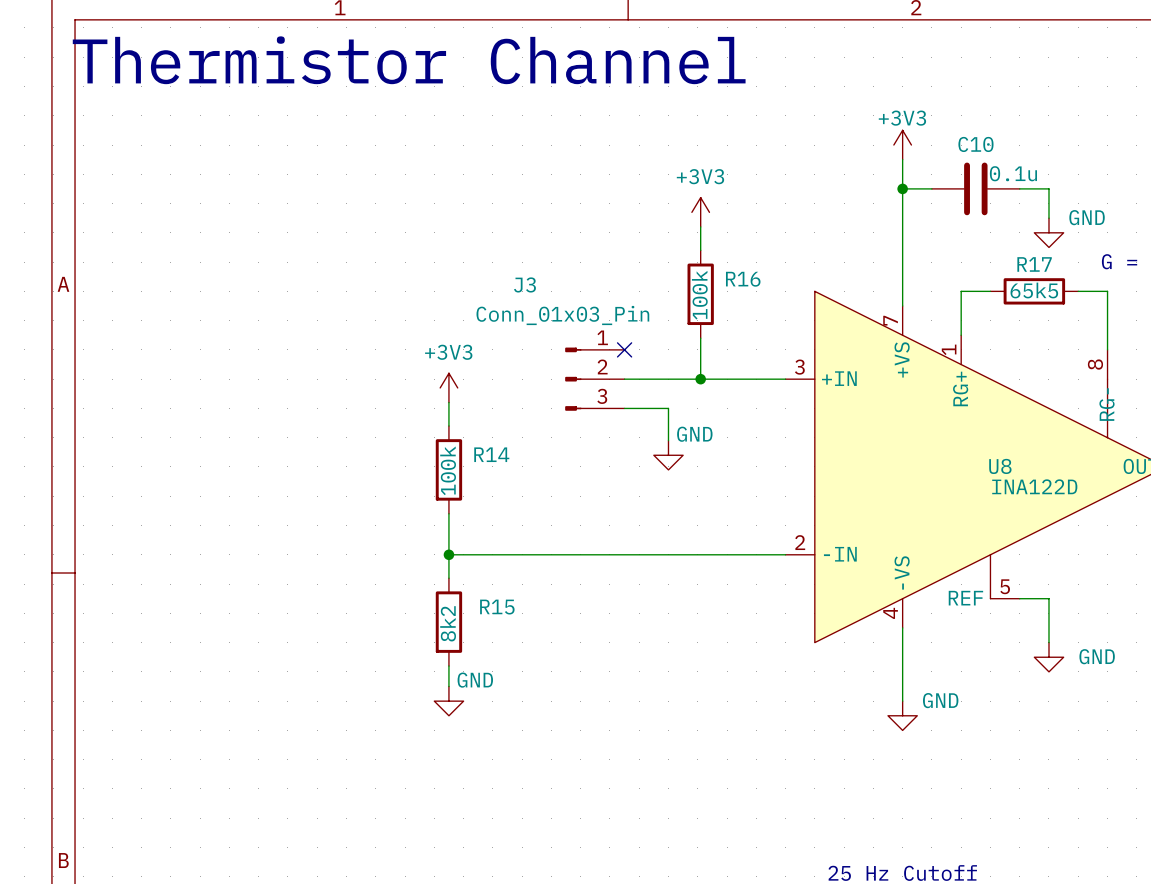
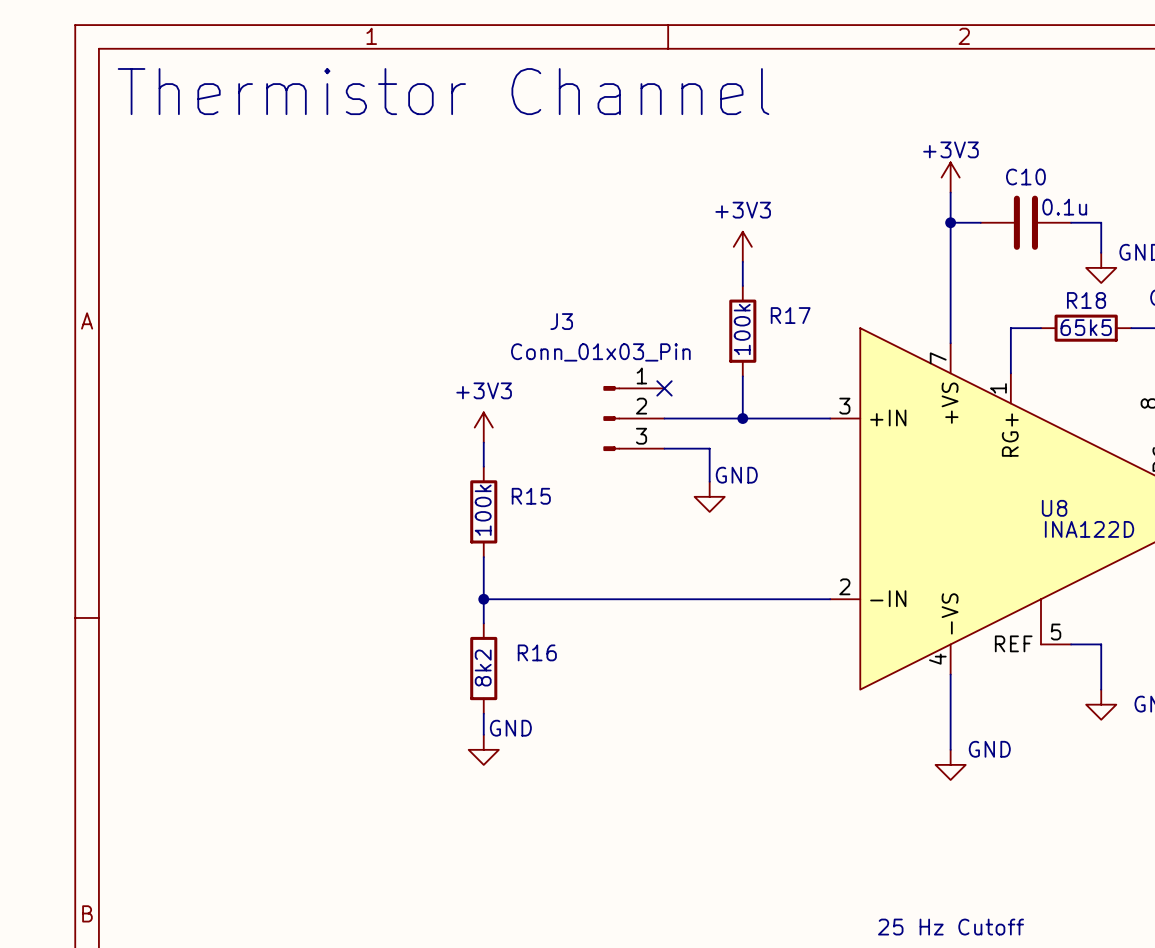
R17 name: R17 (1034, 264) -> R18 (1086, 300)
R16 name: R16 (743, 279) -> R17 (790, 315)
R14 name: R14 (491, 454) -> R15 (531, 496)
R15 name: R15 (497, 607) -> R16 (537, 652)

